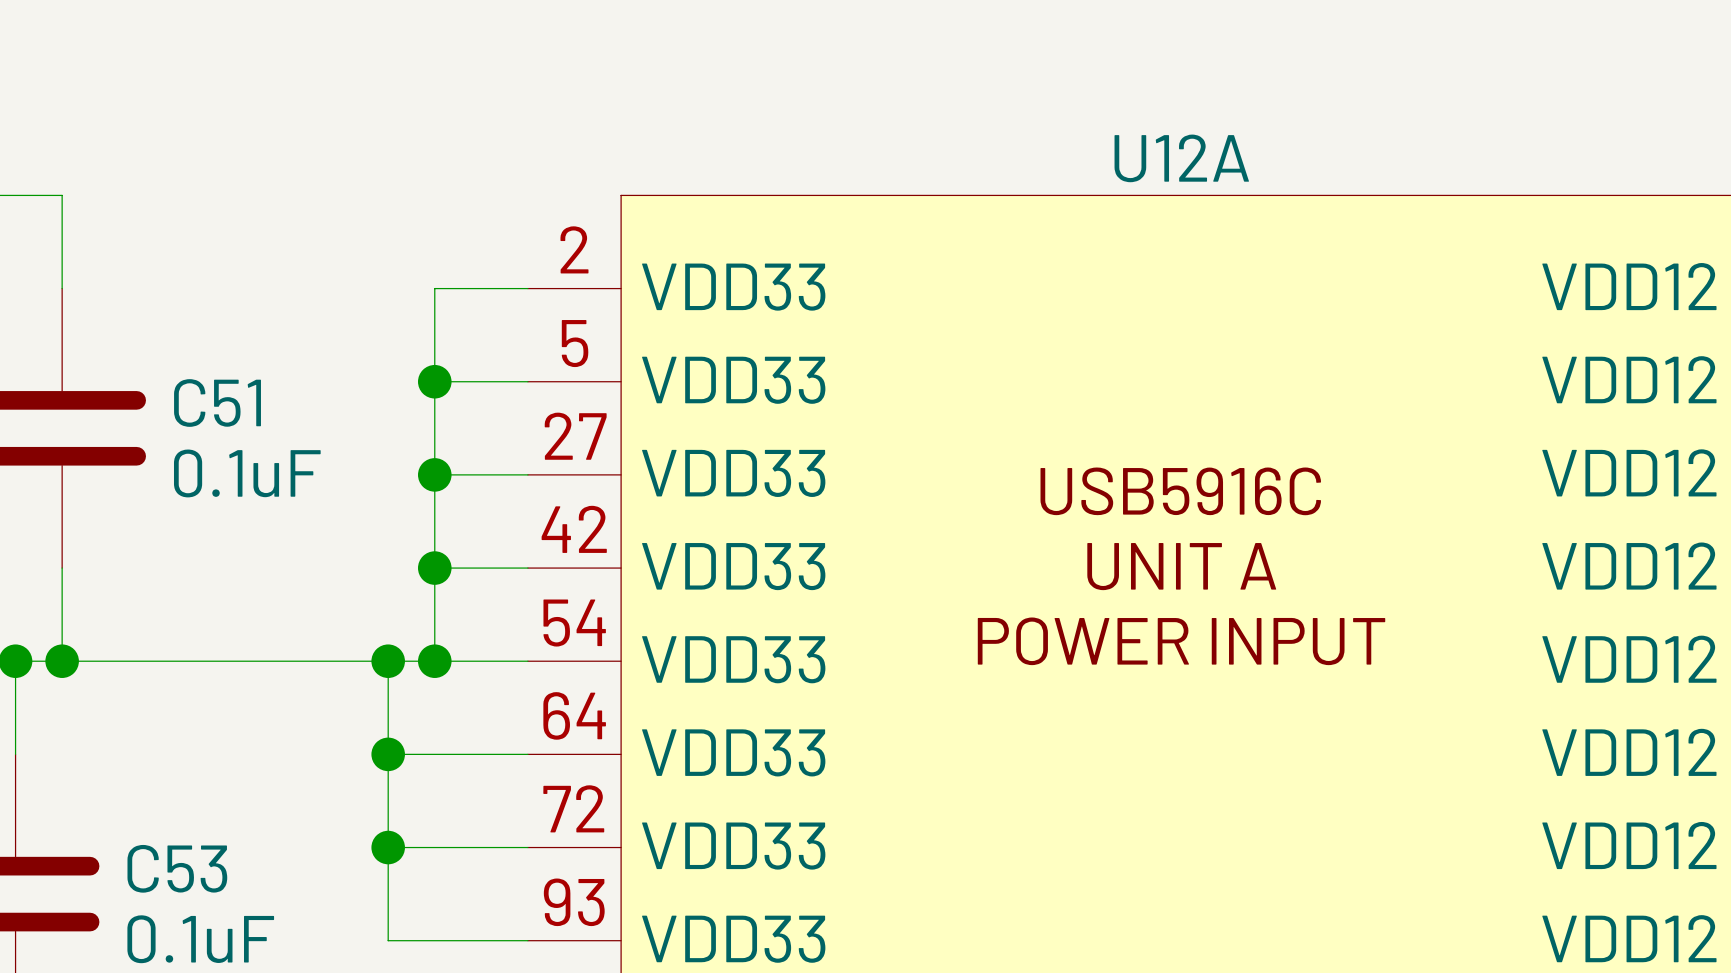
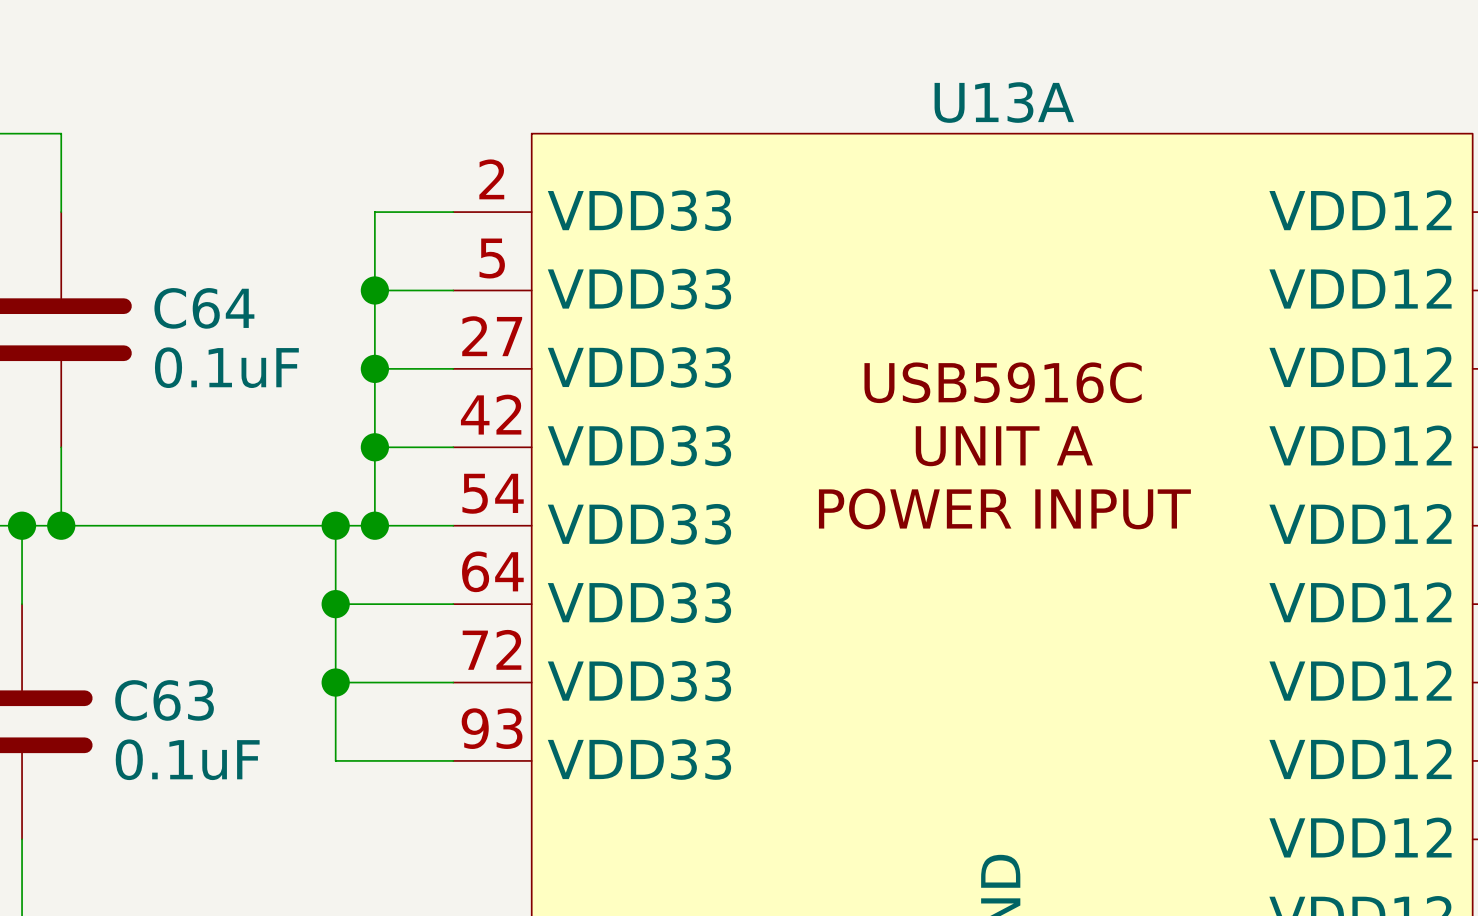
U12A name: U12A (1181, 158) -> U13A (1004, 102)
C51 name: C51 (217, 403) -> C64 (204, 308)
C53 name: C53 (177, 868) -> C63 (164, 700)

